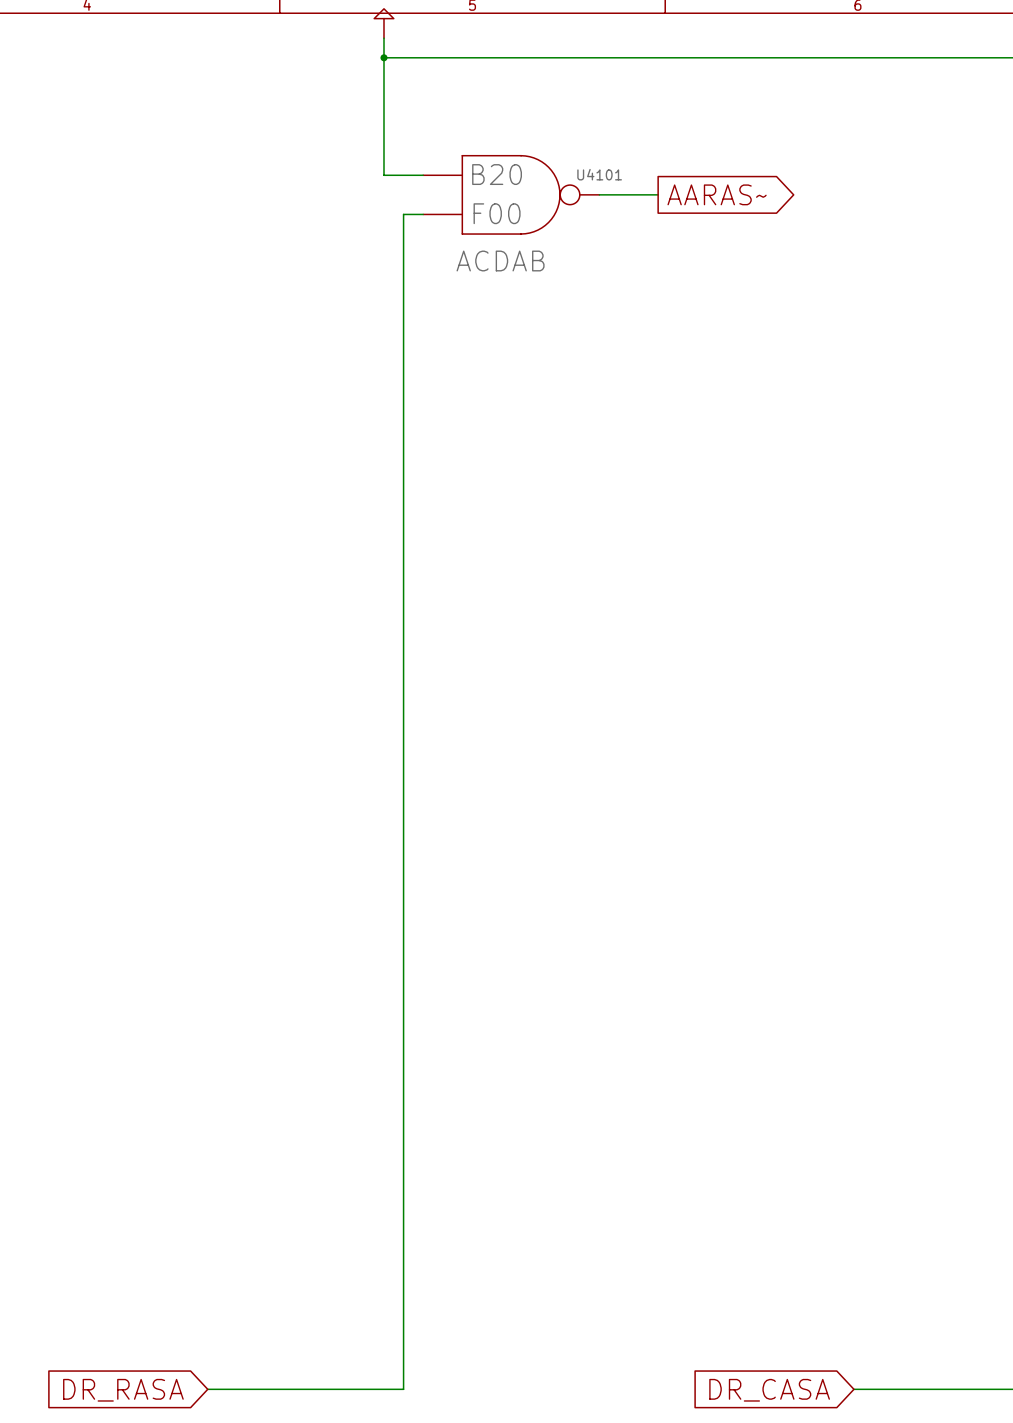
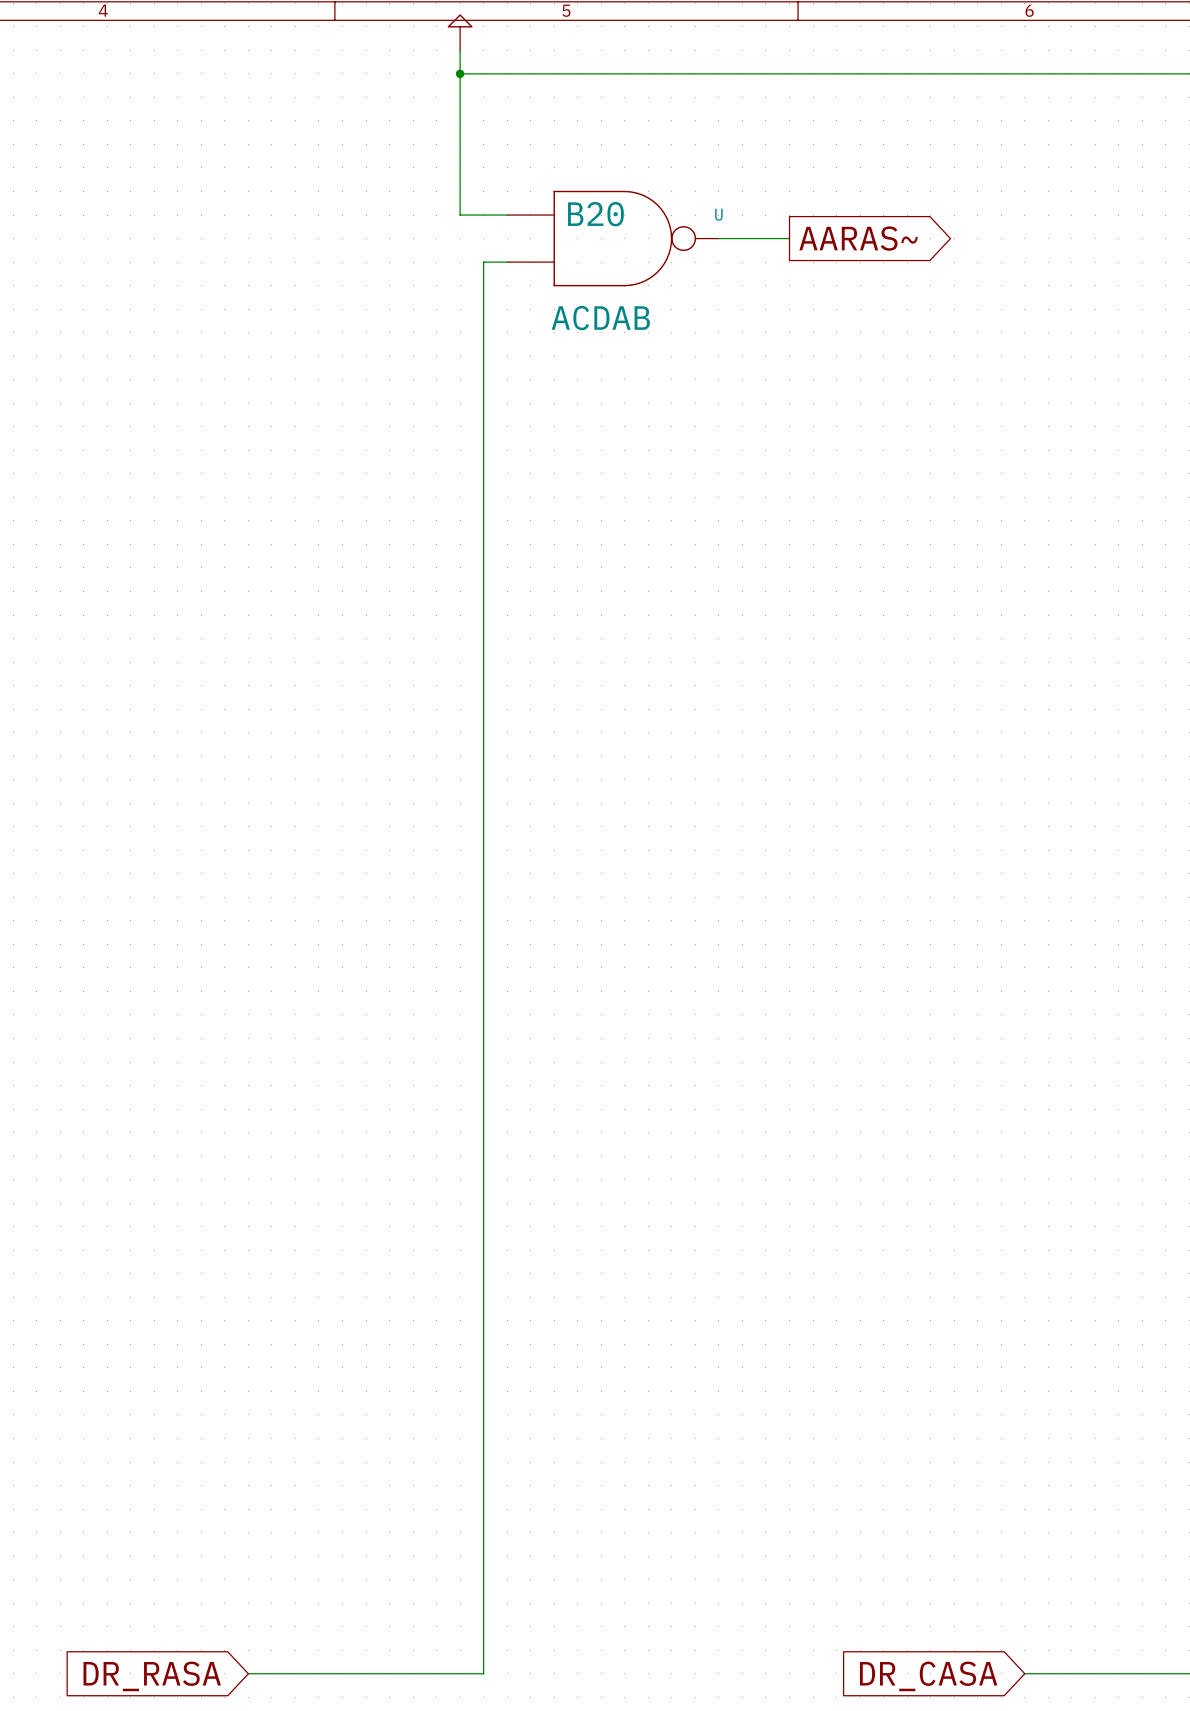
U4101 name: U4101 (599, 174) -> U (718, 214)
U4101 value: F00 (497, 213) -> none

